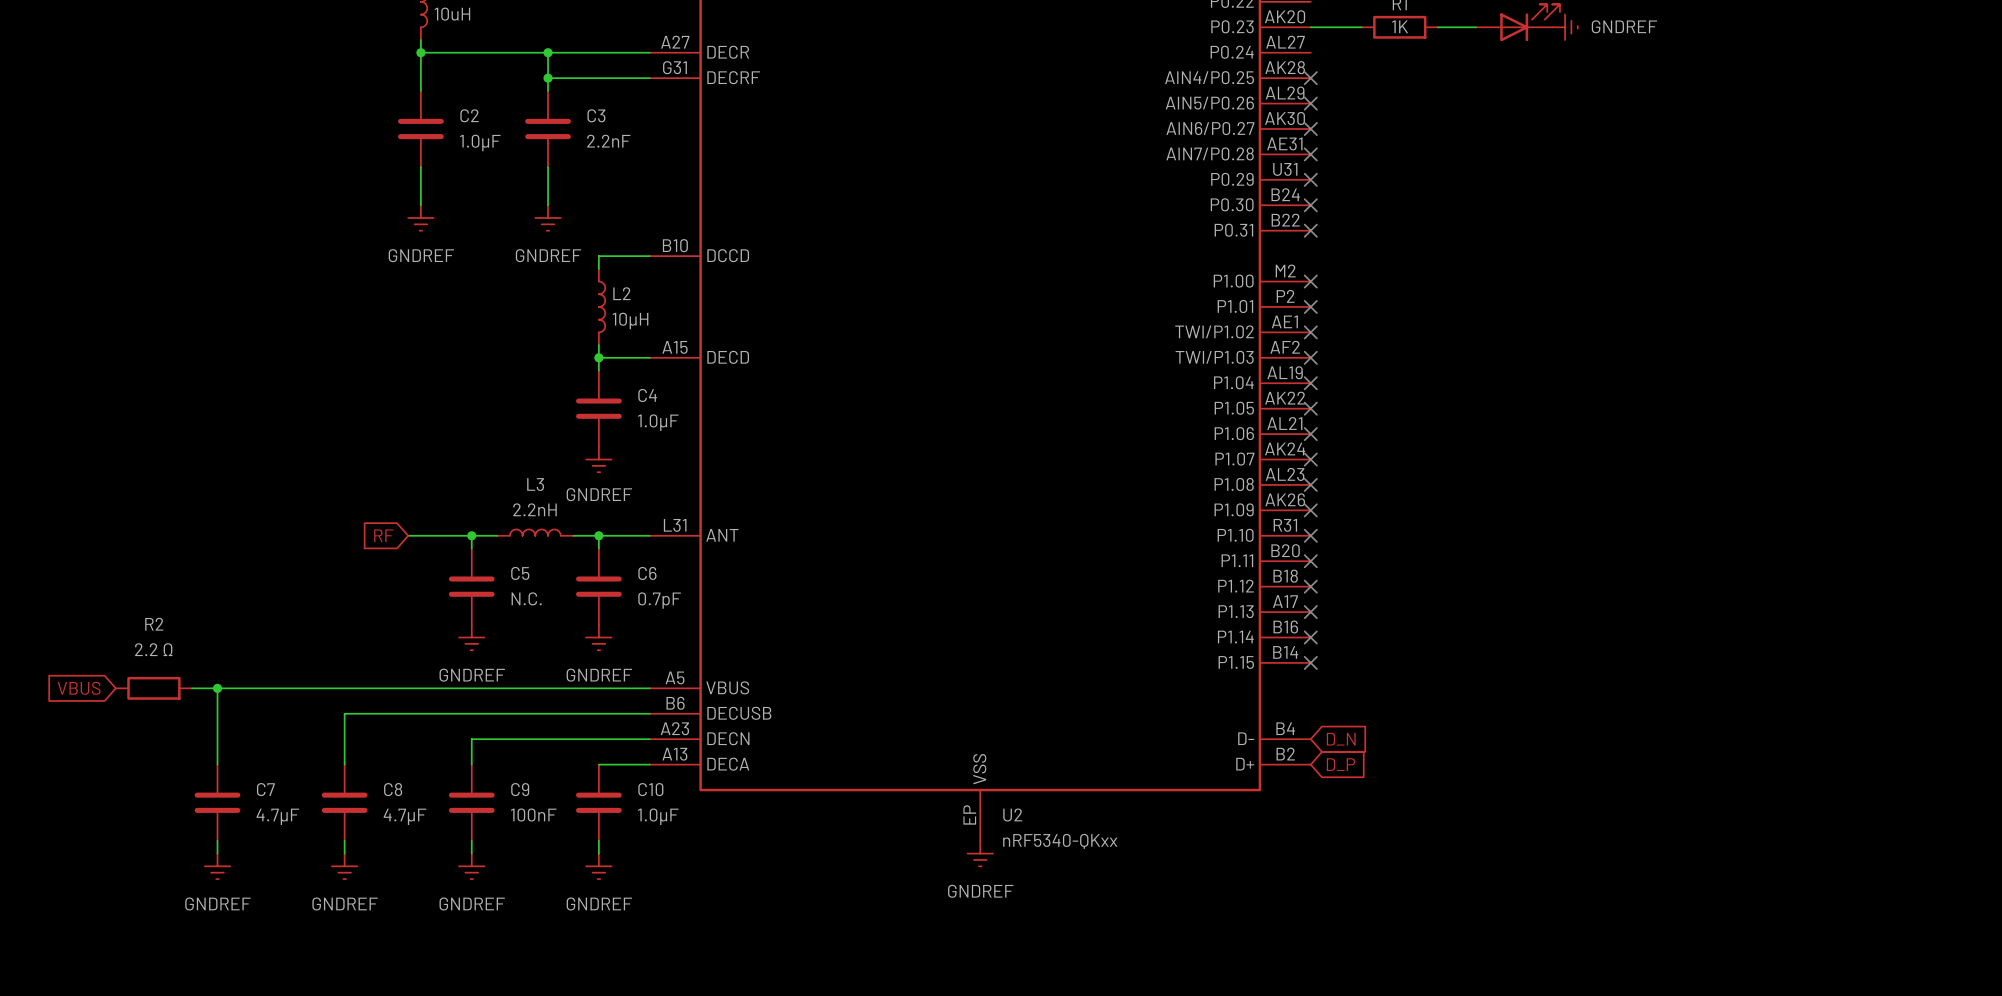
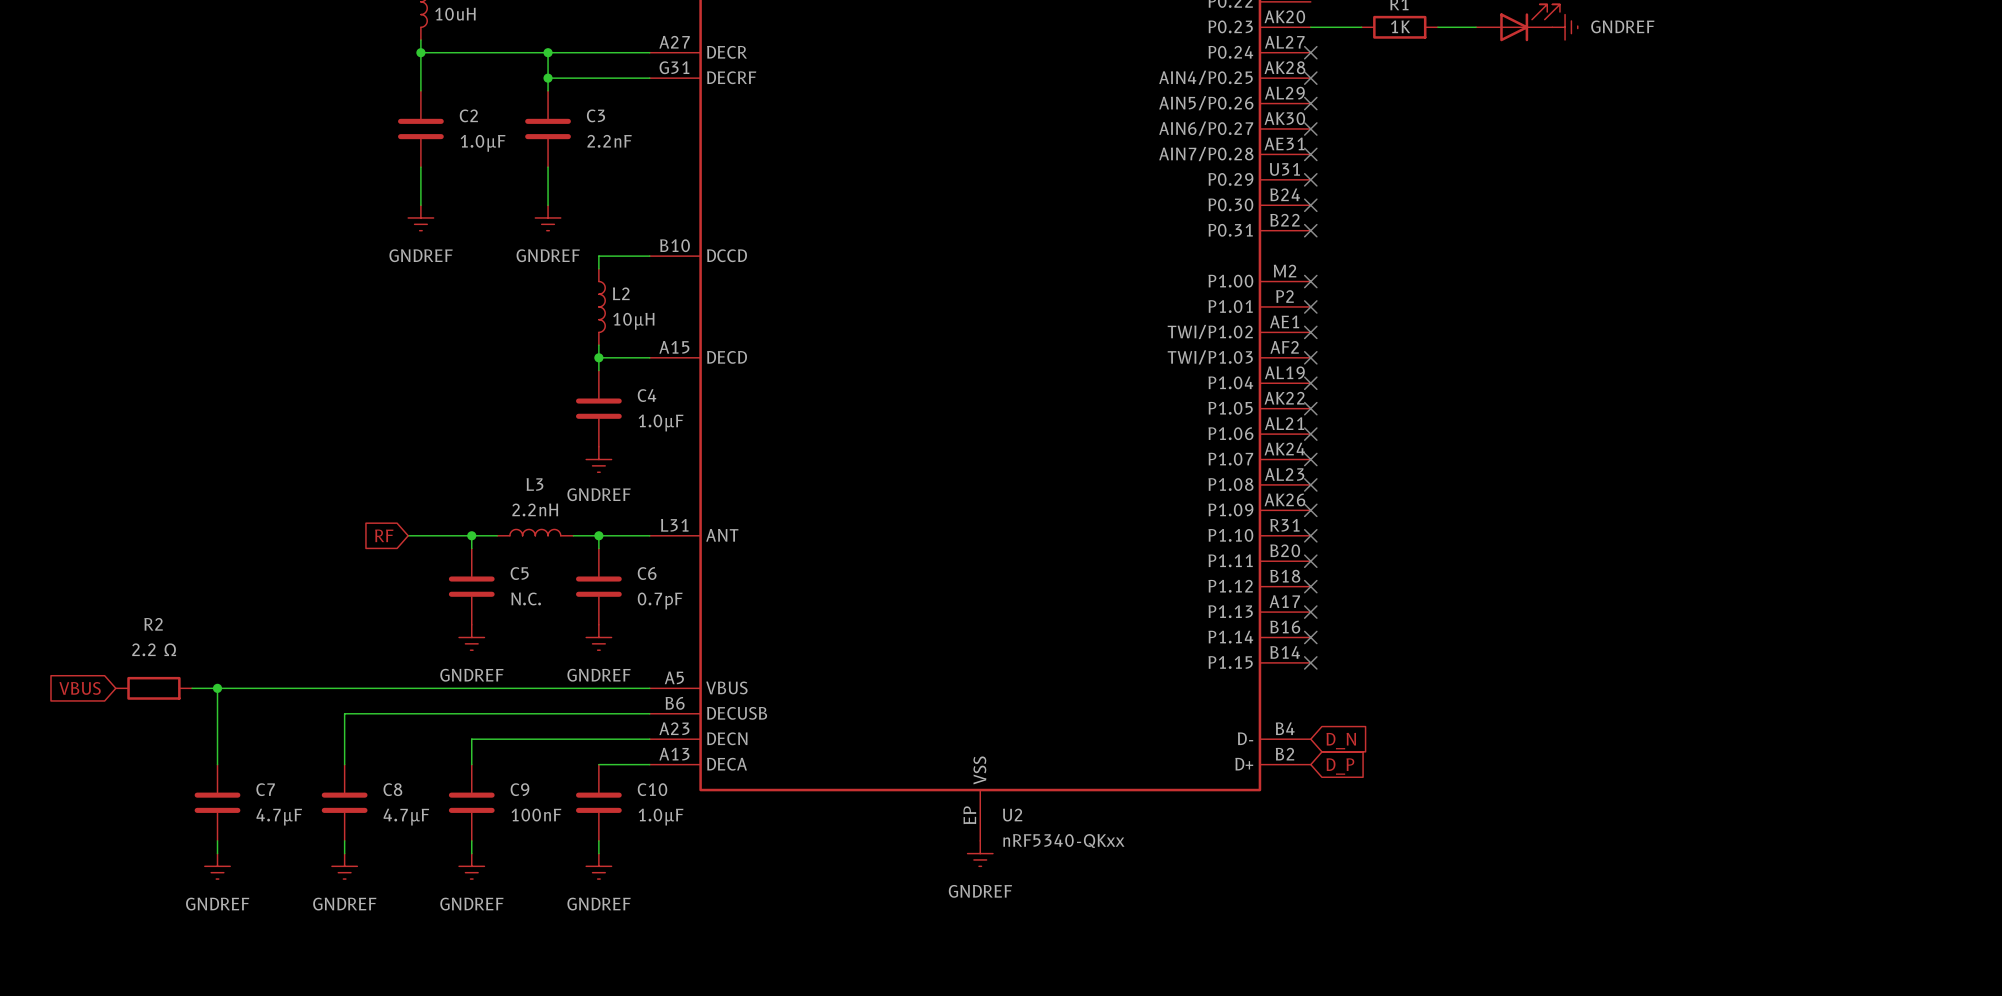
no-connect mark: none -> (1310, 52)

